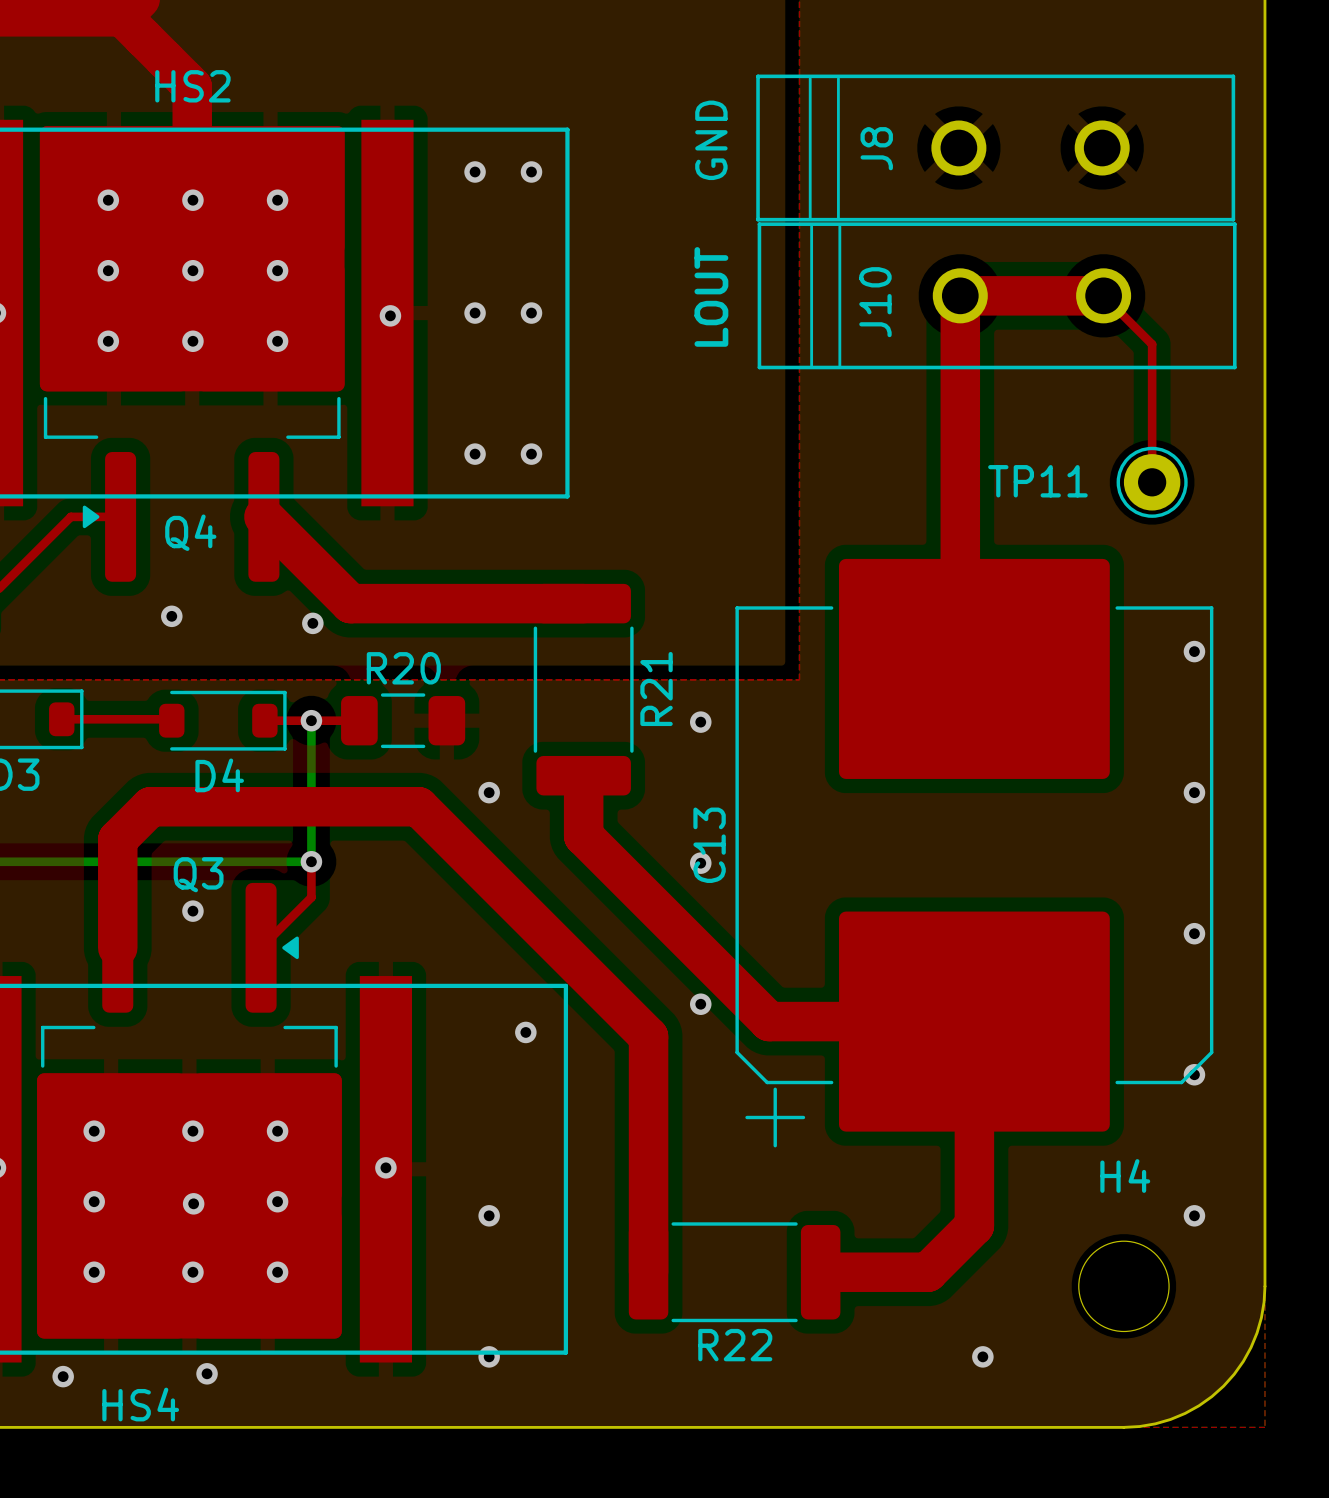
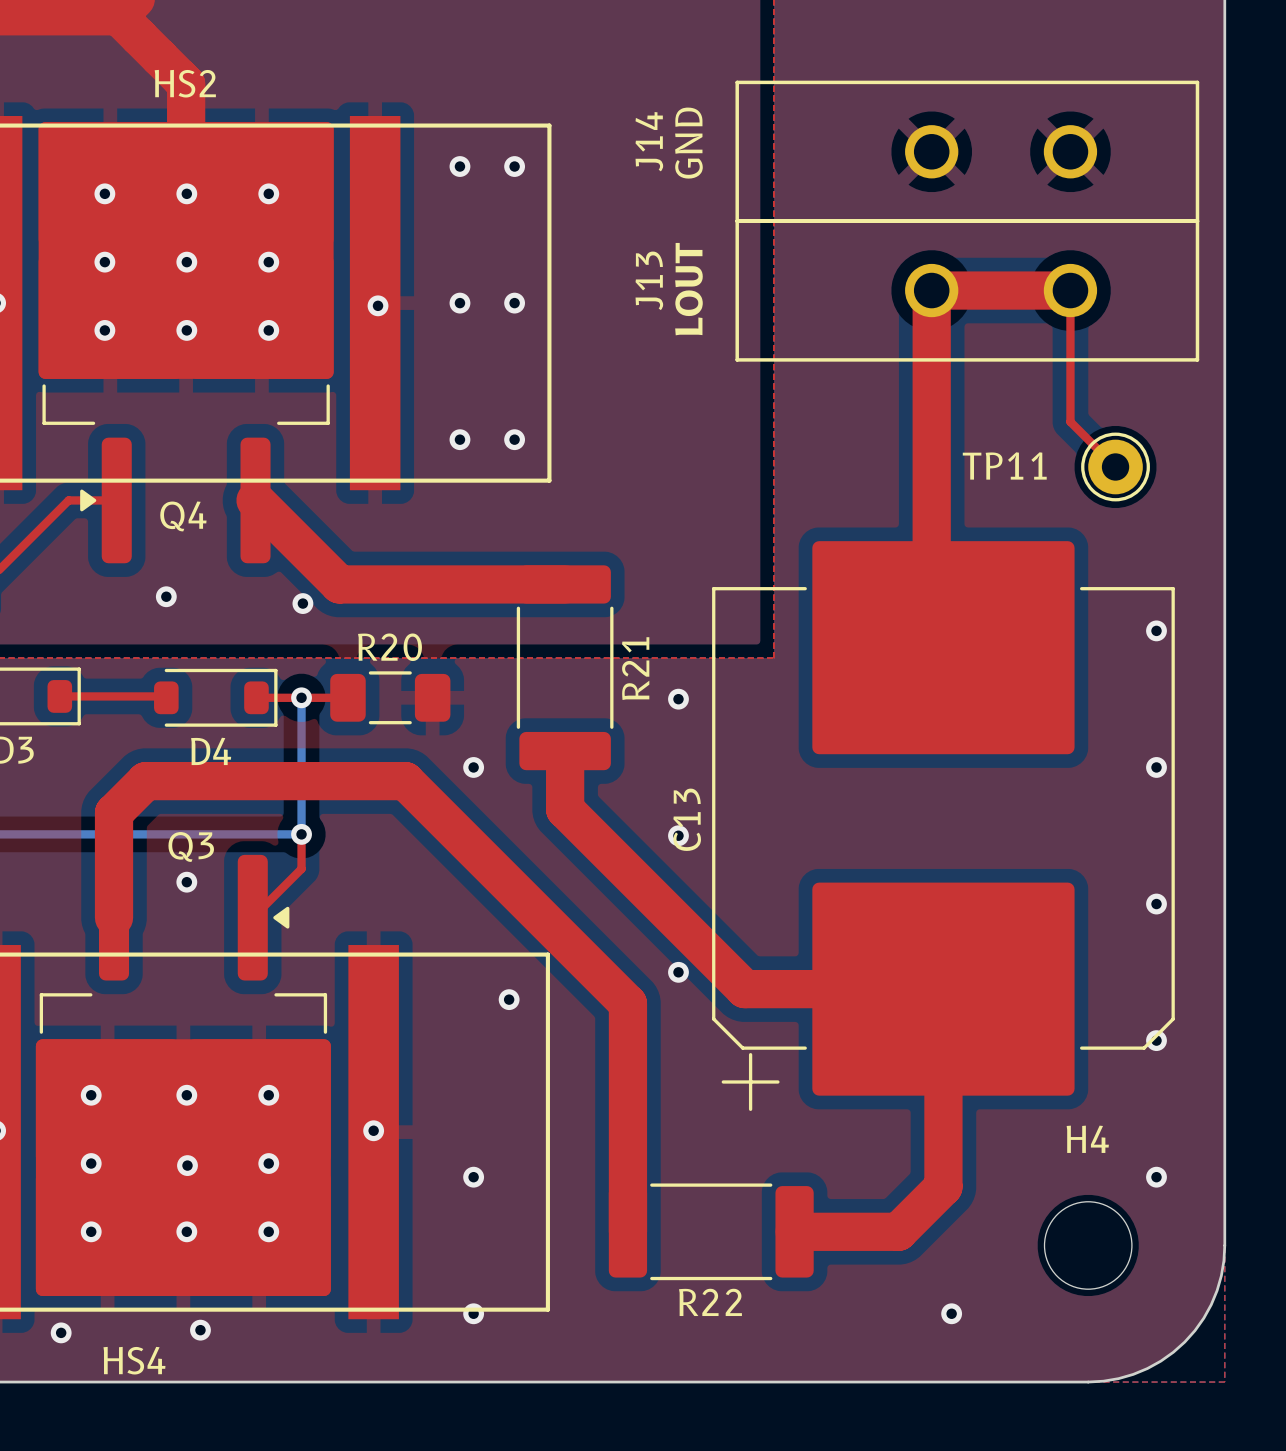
J8: (995, 148) -> none
J14: none -> (967, 151)
J10: (997, 295) -> none
J13: none -> (967, 290)
top track: (1152, 482) (1152, 344) (1103, 295) (960, 295) (960, 654) -> (1115, 466) (1070, 421) (1070, 290) (931, 290) (931, 635)

